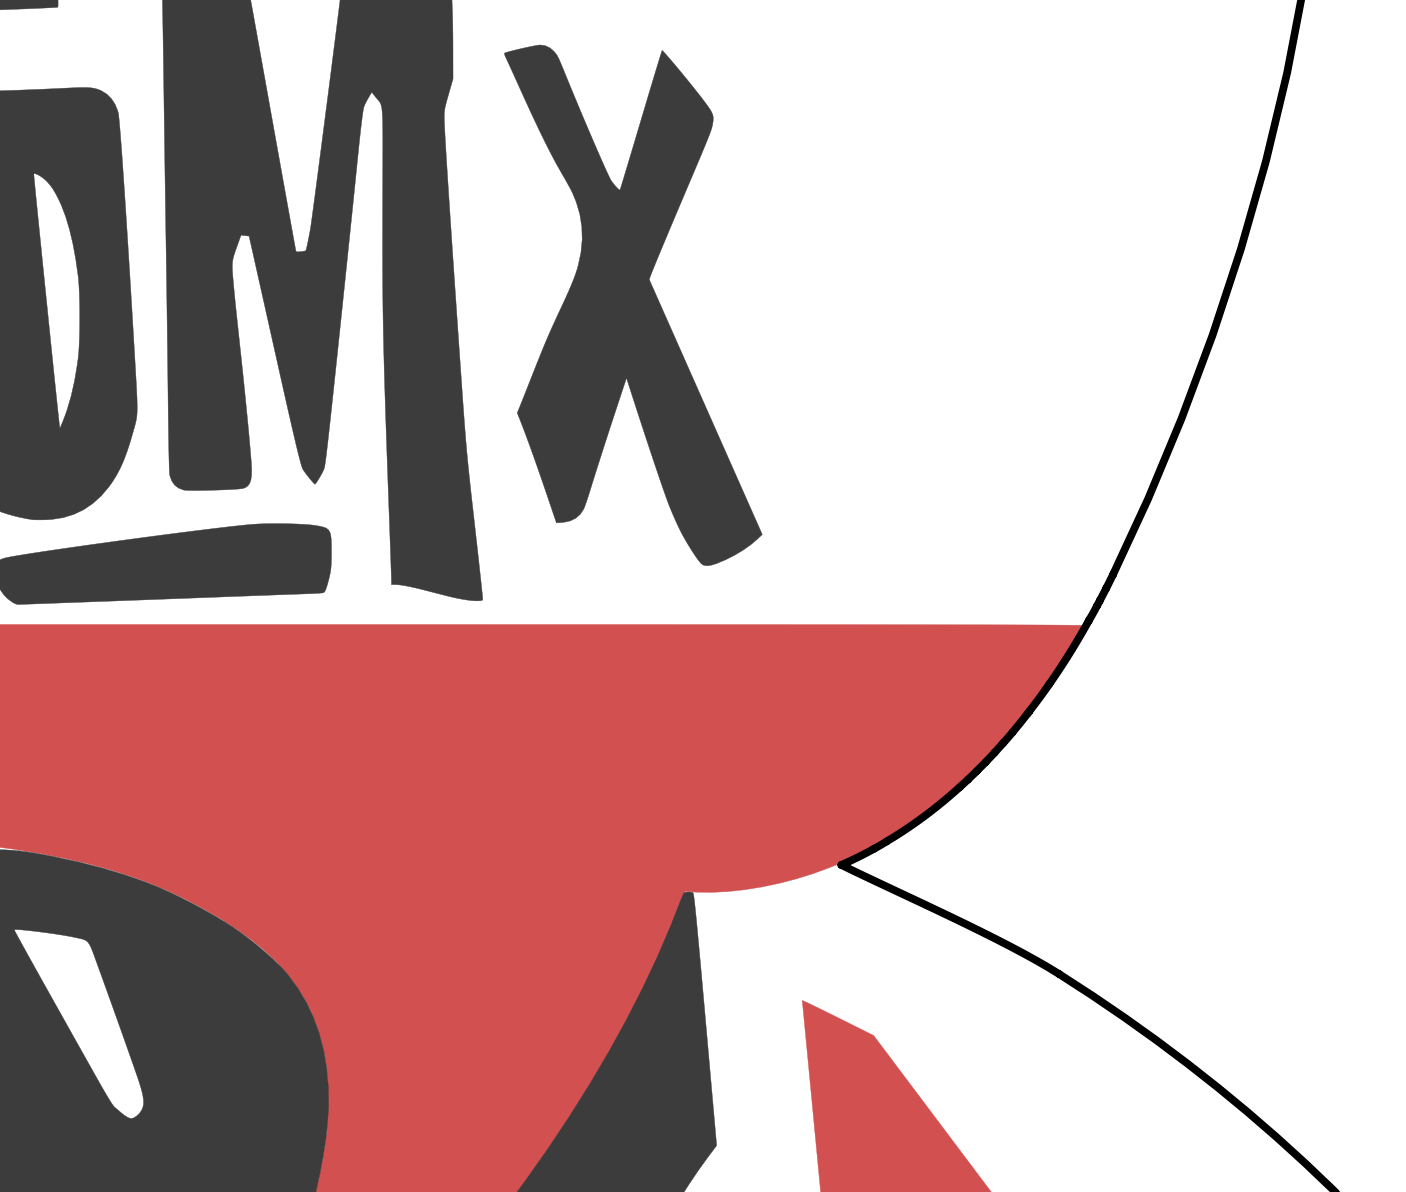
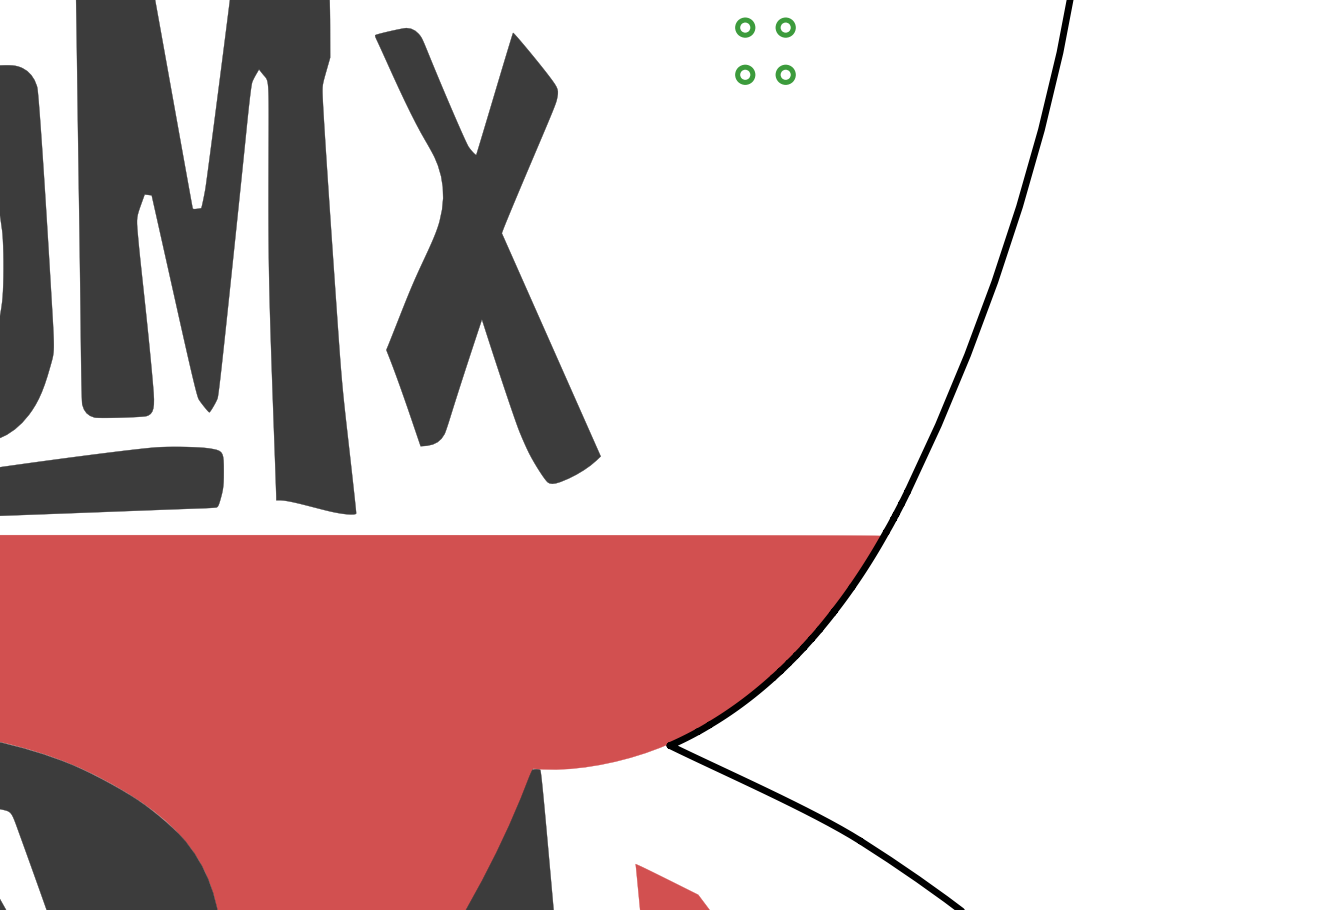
via: none -> (745, 27)
via: none -> (785, 27)
via: none -> (745, 74)
via: none -> (785, 74)

